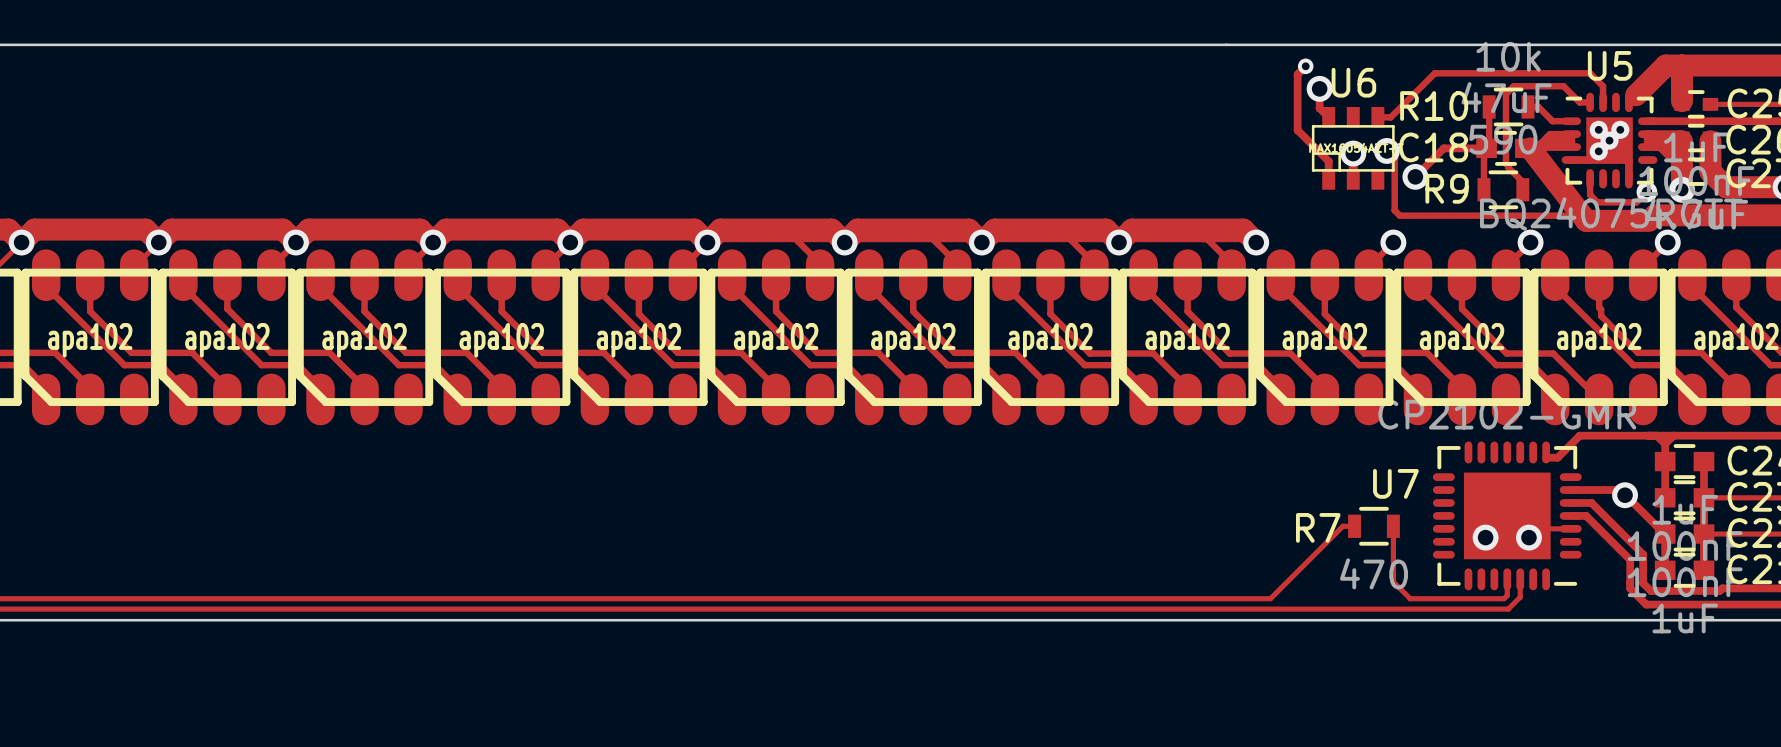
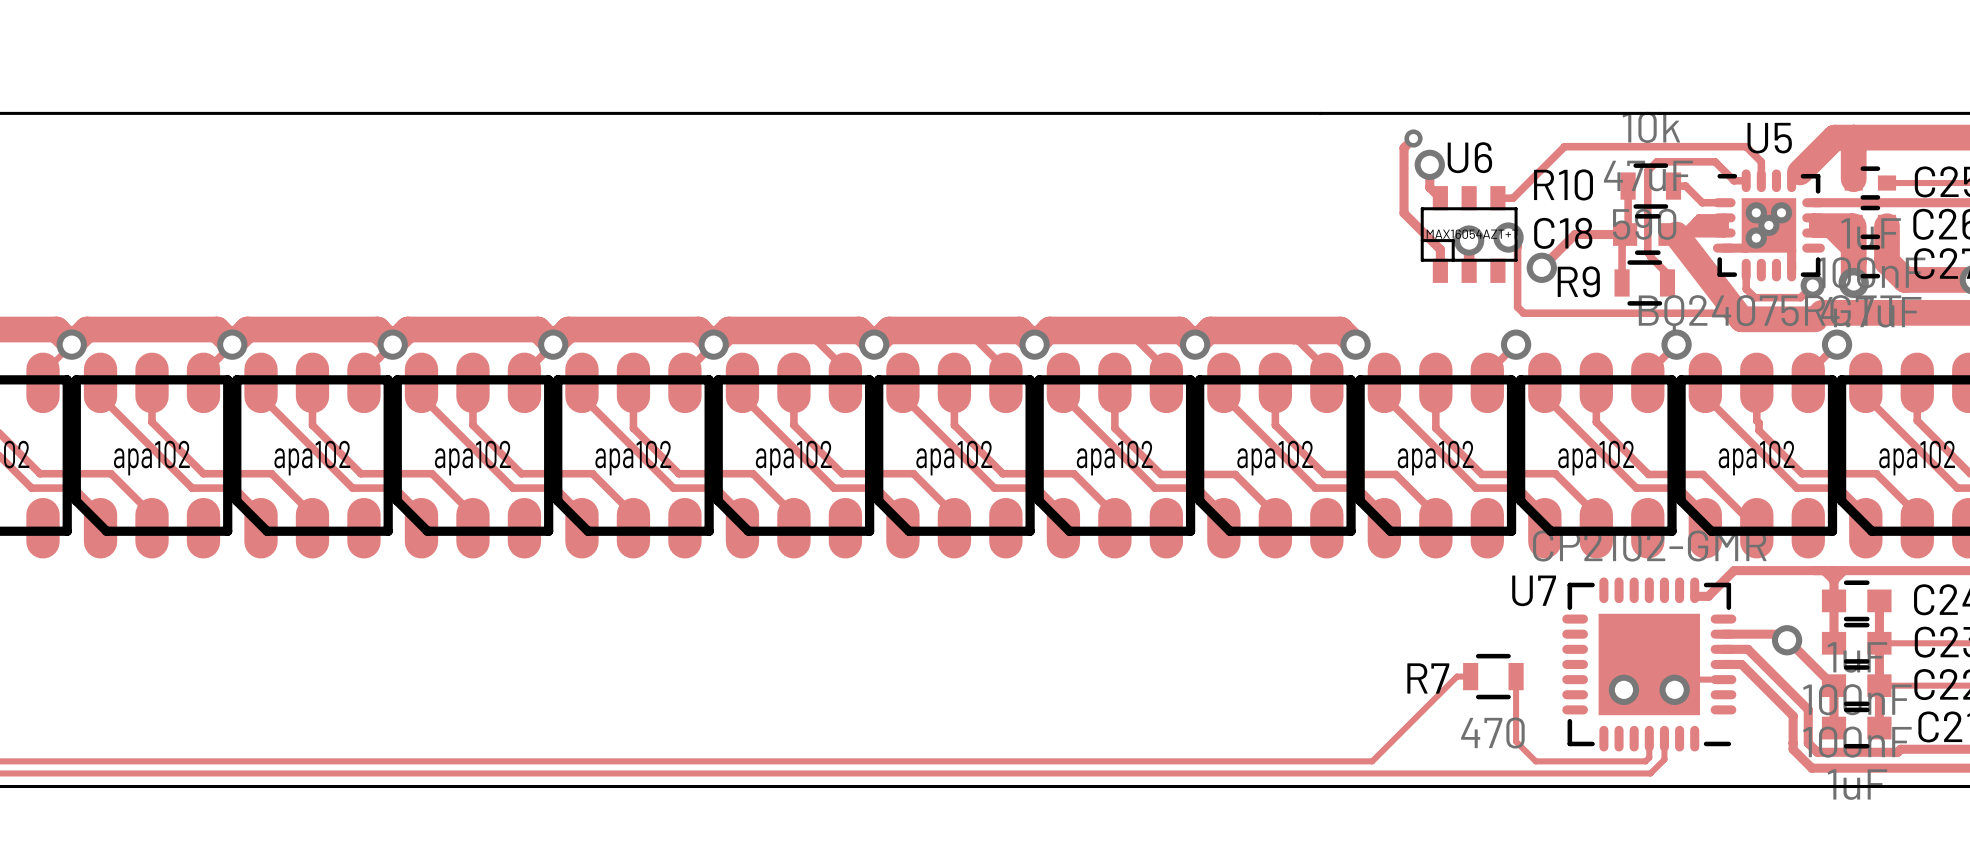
U7 name position: U7 (1395, 483) -> U7 (1534, 590)

